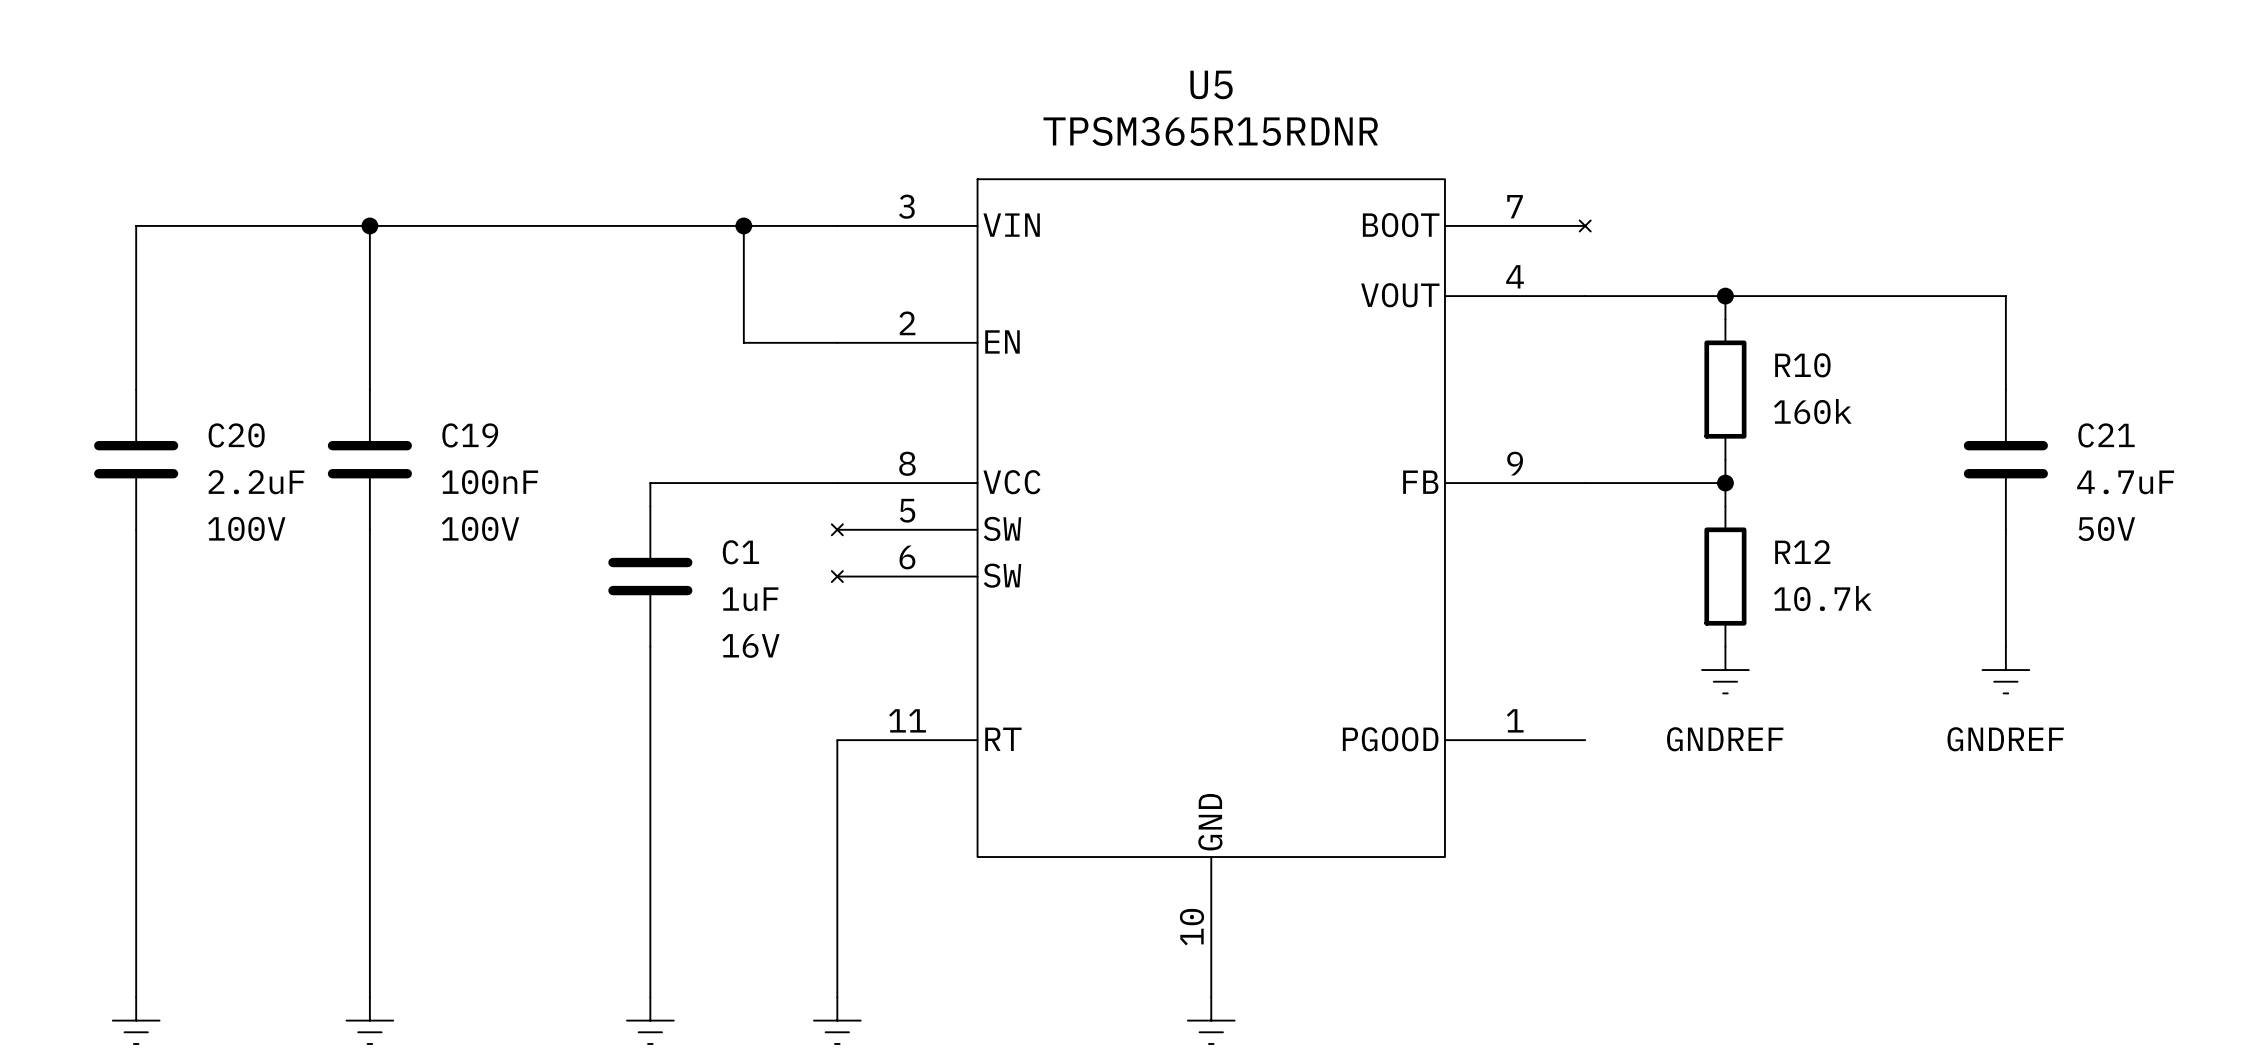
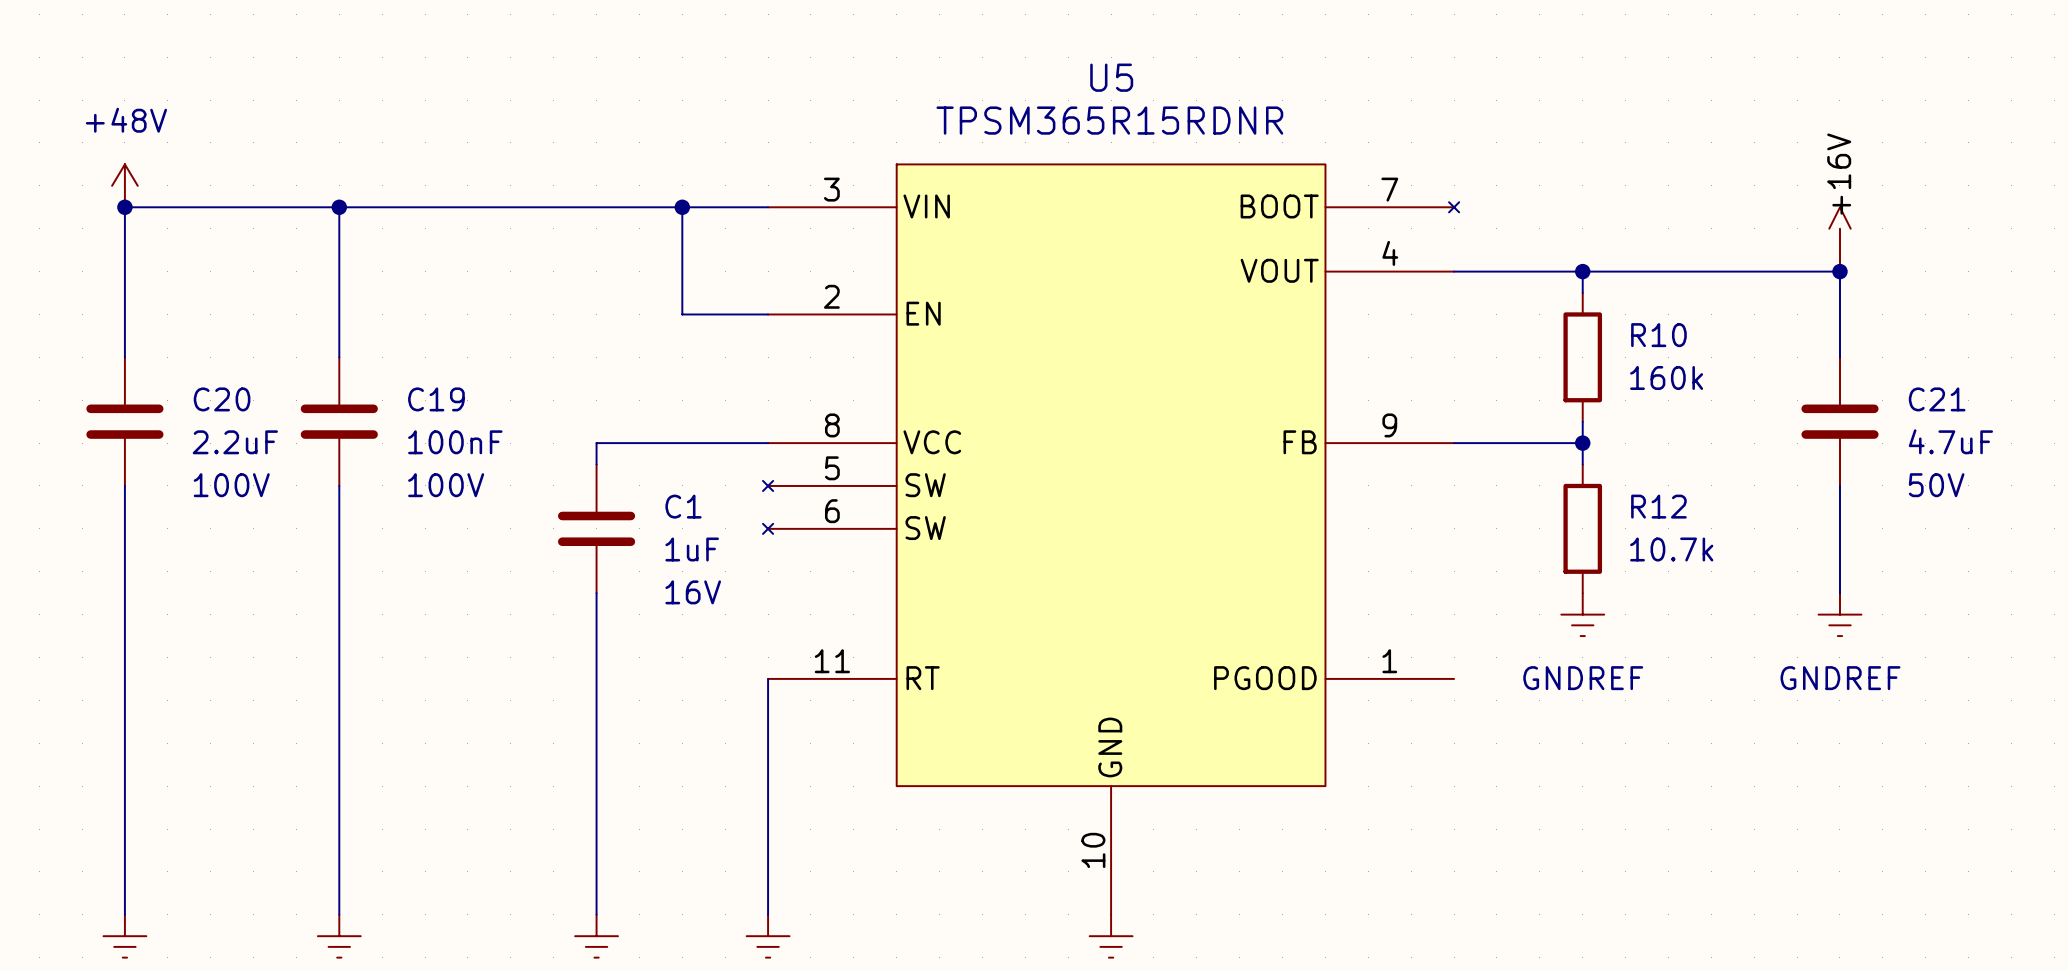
power symbol: none -> +48V (124, 185)
junction: none -> (124, 207)
power symbol: none -> (1839, 239)
junction: none -> (1839, 271)

